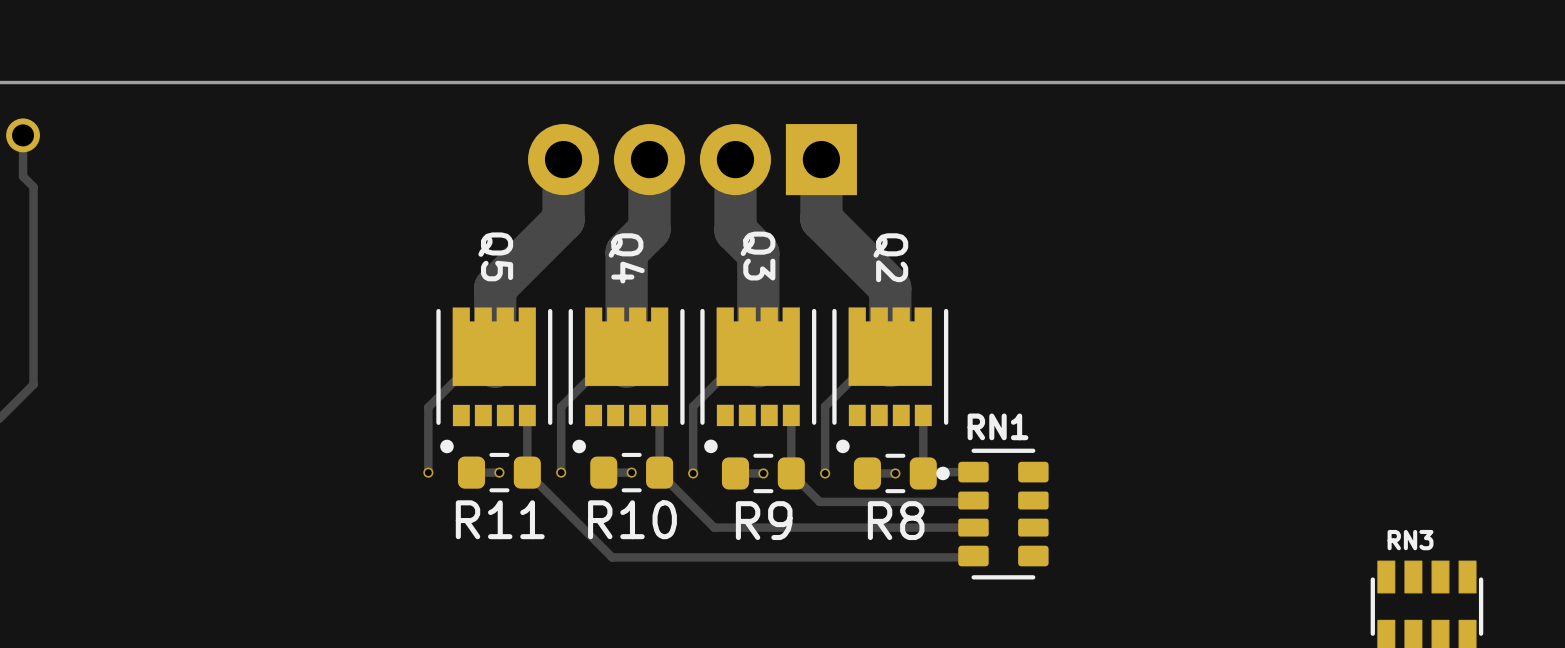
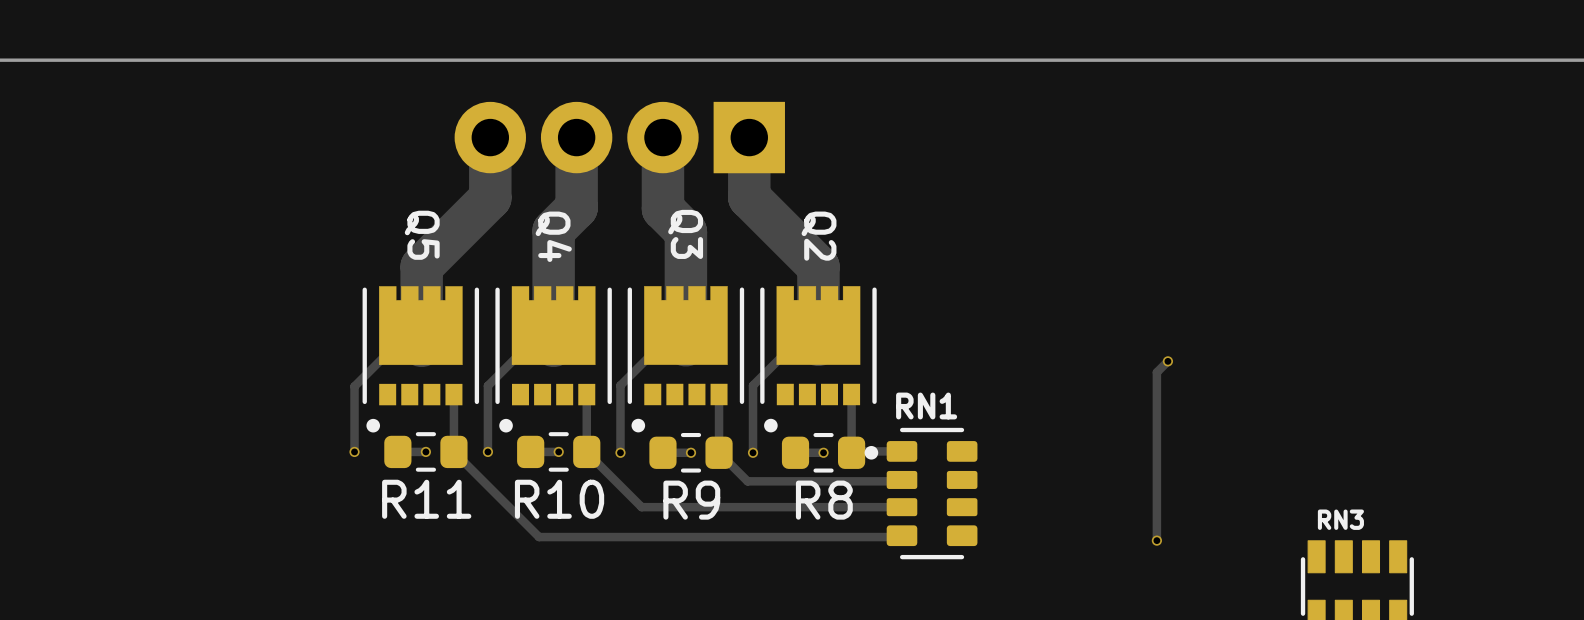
track: none -> (1167, 361) (1156, 372) (1156, 540)
via: none -> (1167, 361)
via: none -> (1156, 540)

